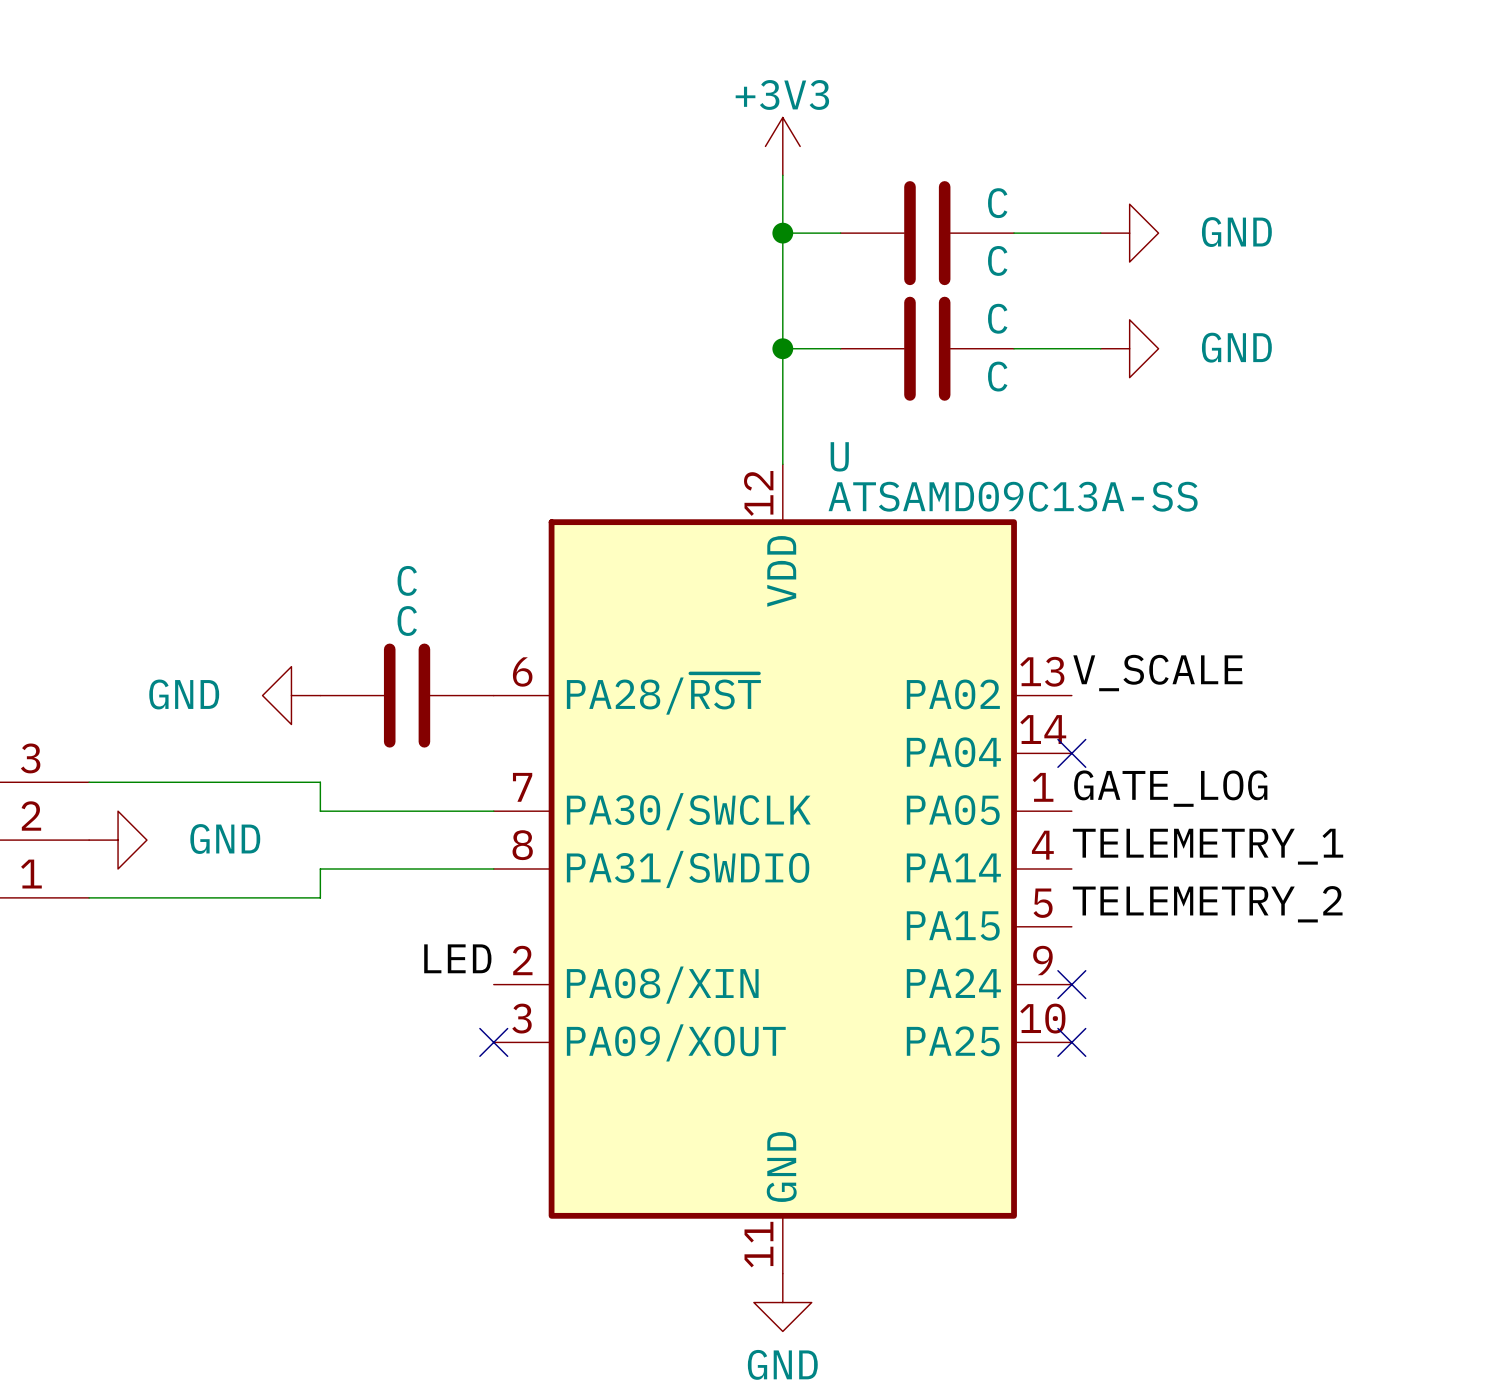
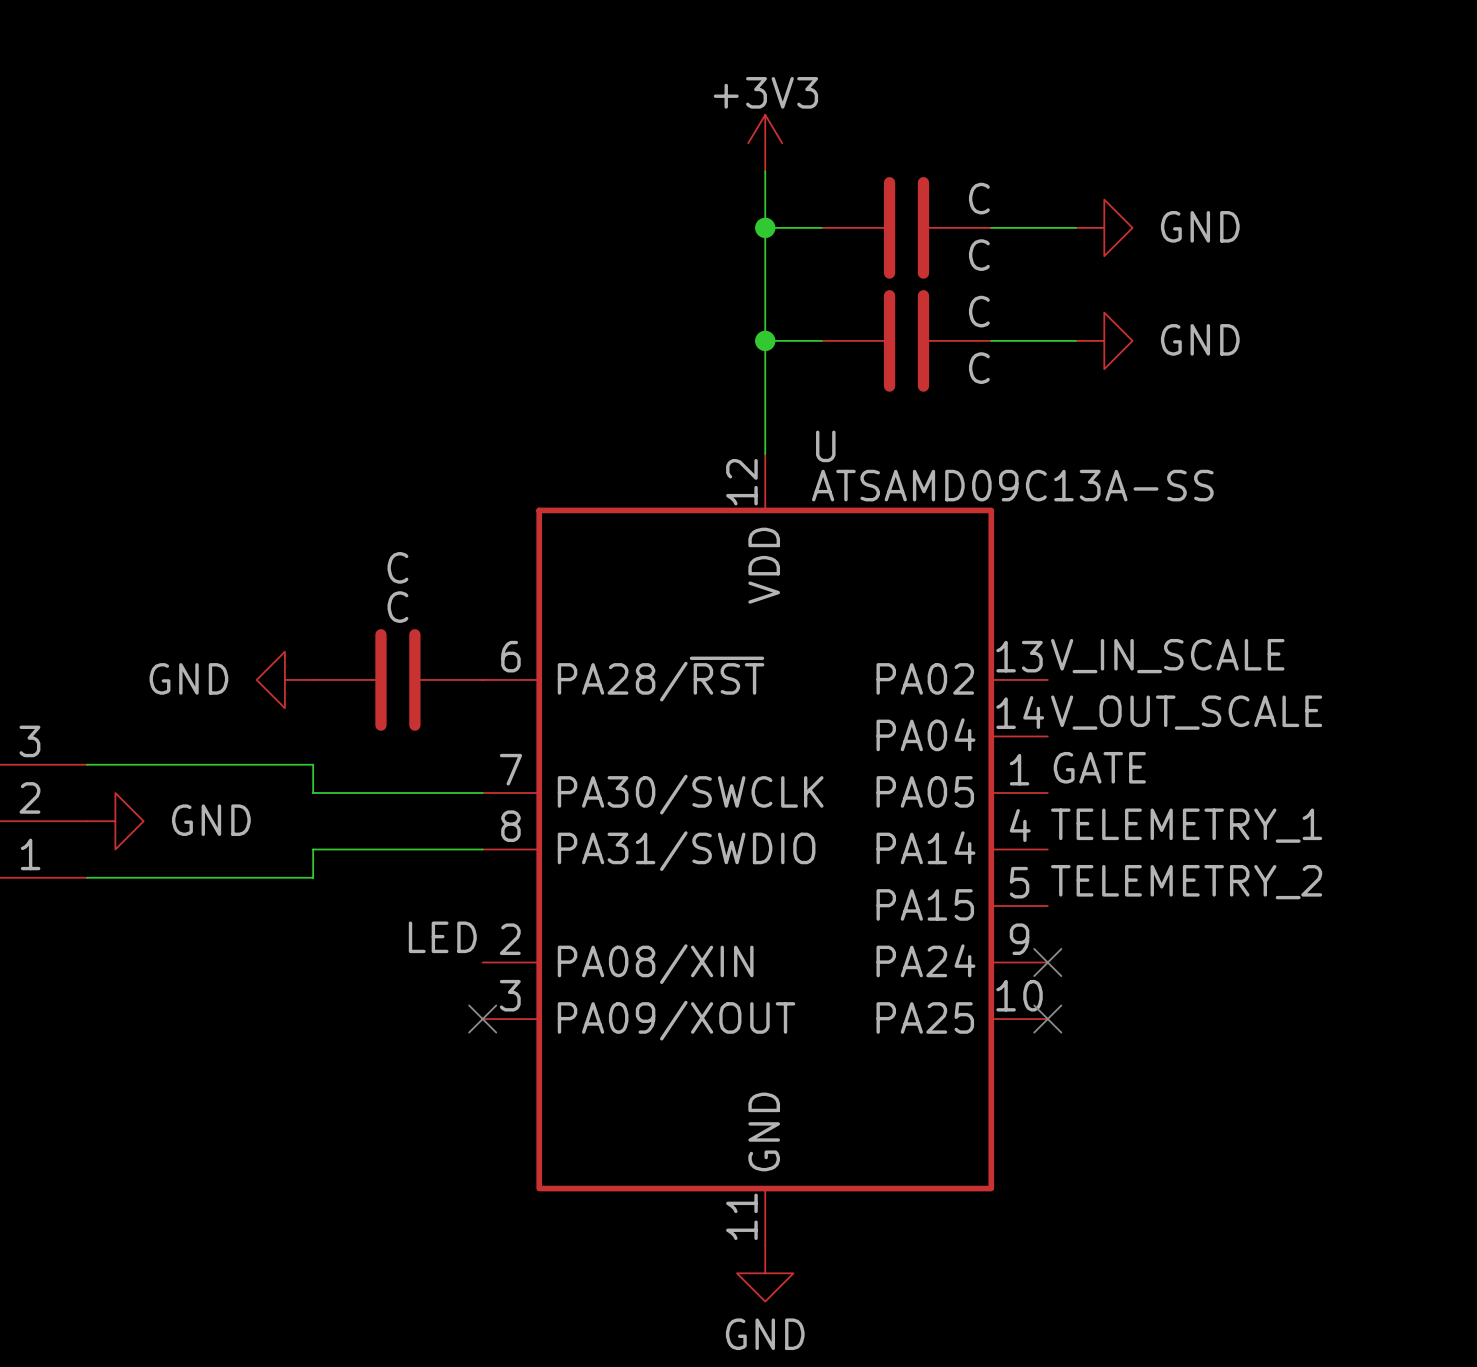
label: V_SCALE (1157, 673) -> V_IN_SCALE (1167, 656)
label: none -> V_OUT_SCALE (1186, 712)
no-connect mark: (1071, 753) -> none
label: GATE_LOG (1170, 788) -> GATE (1099, 767)

